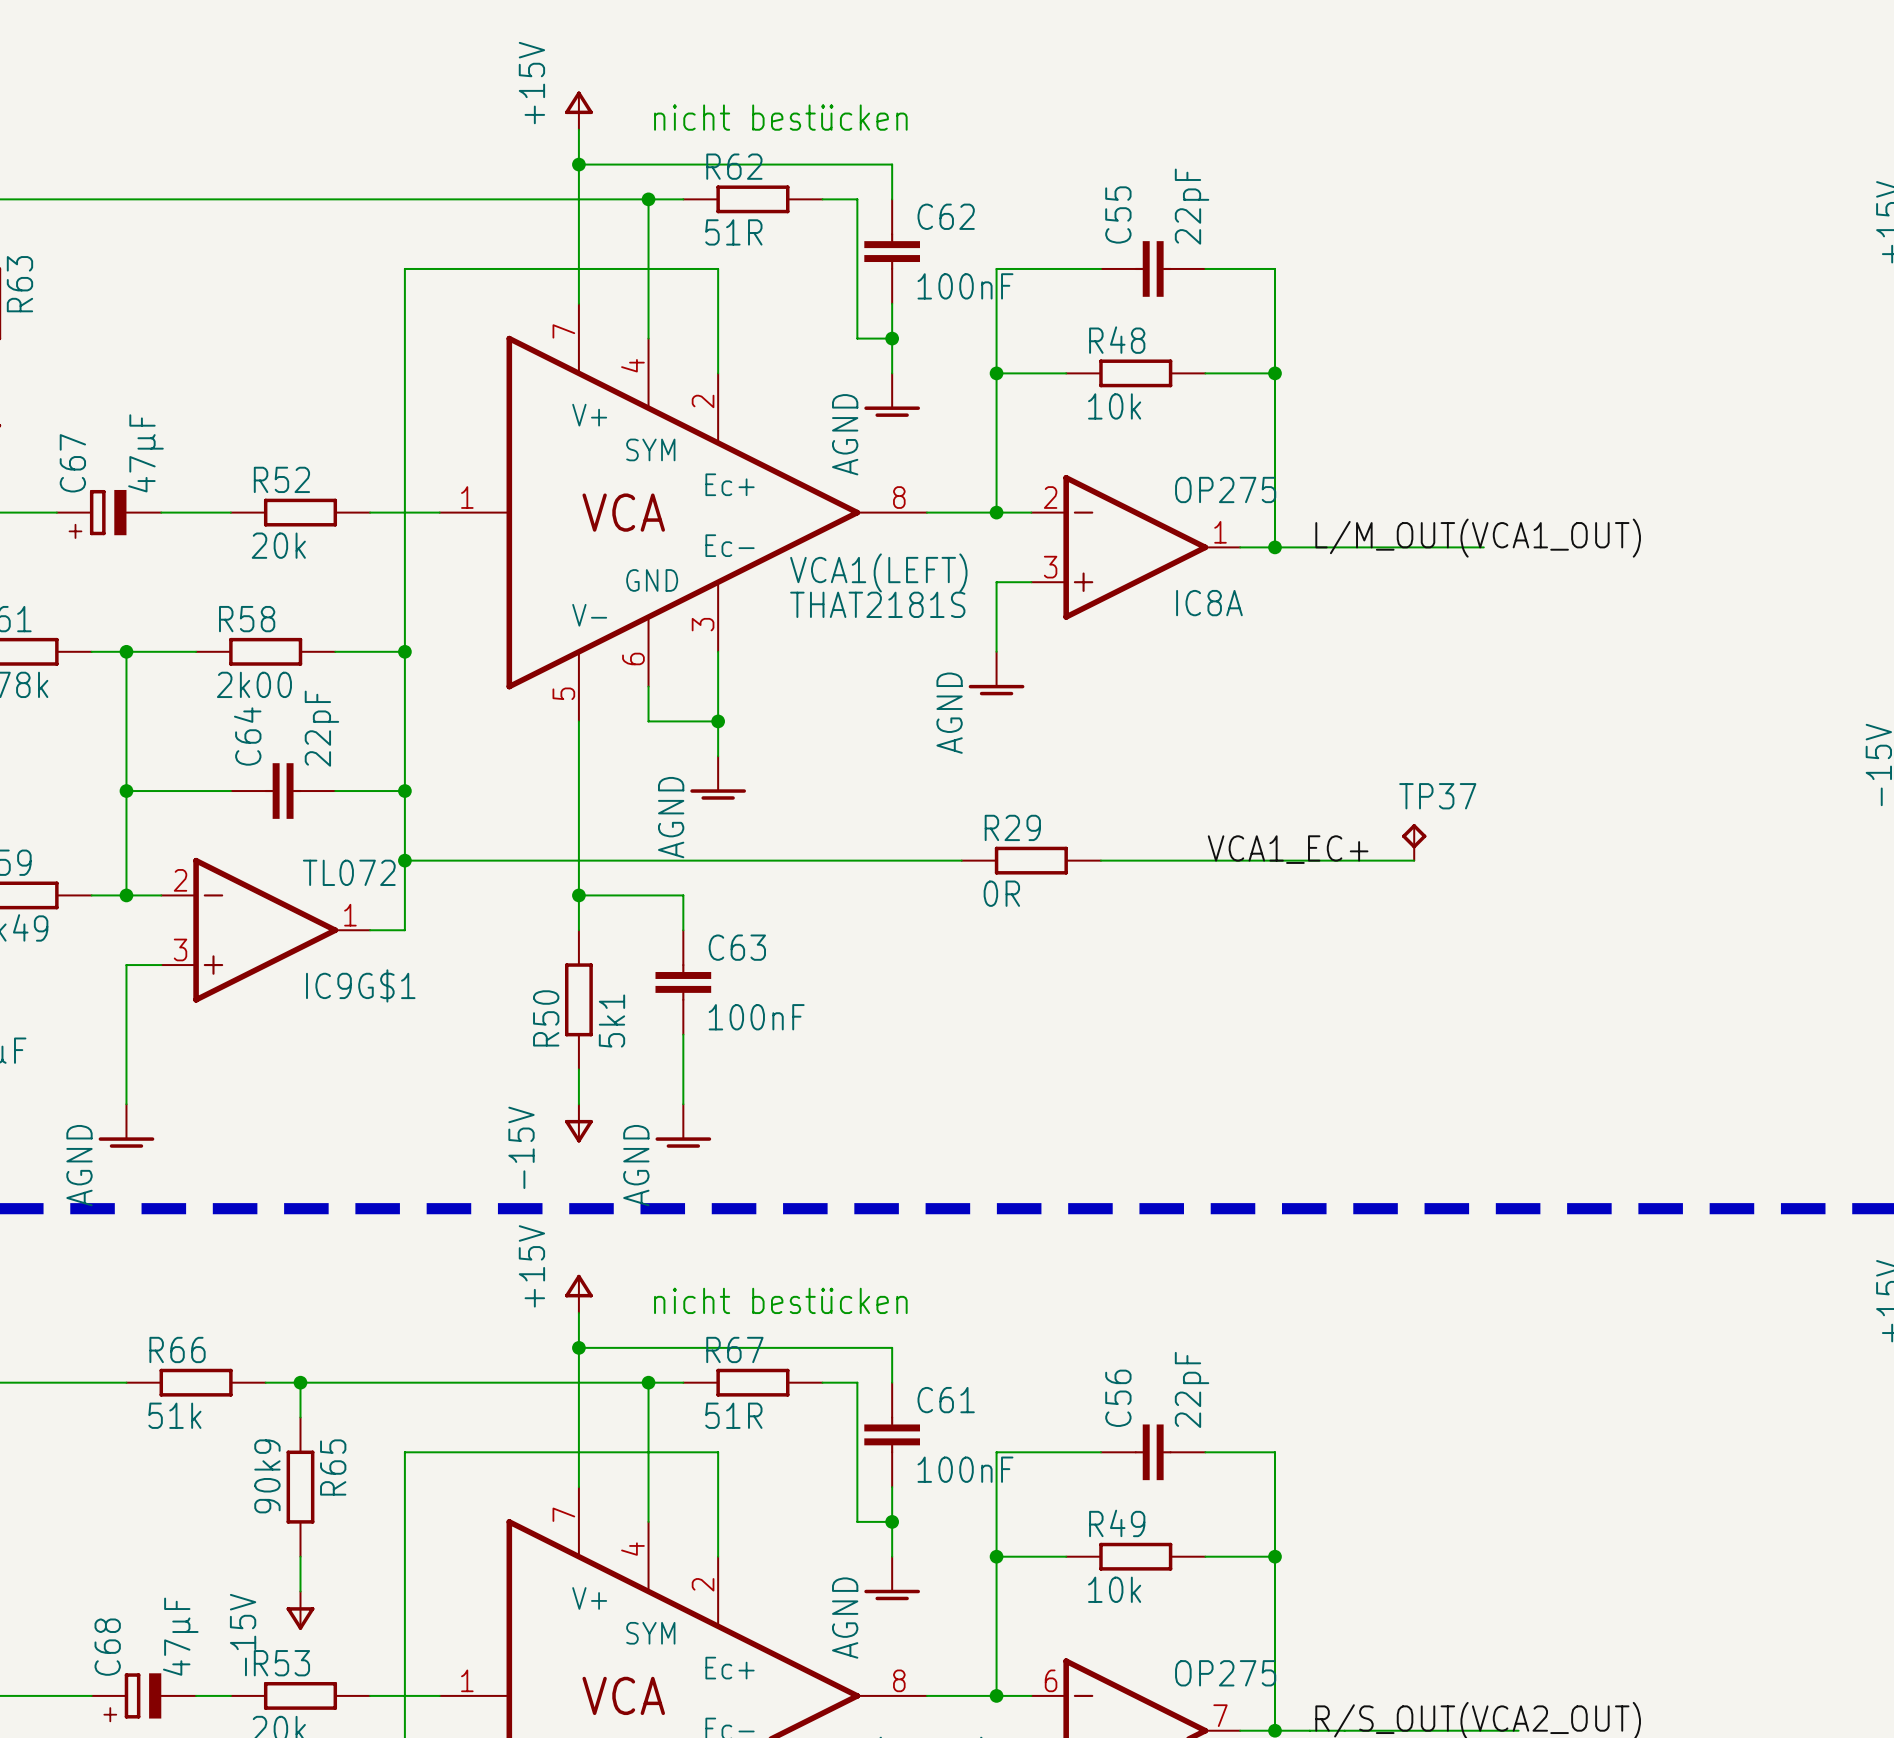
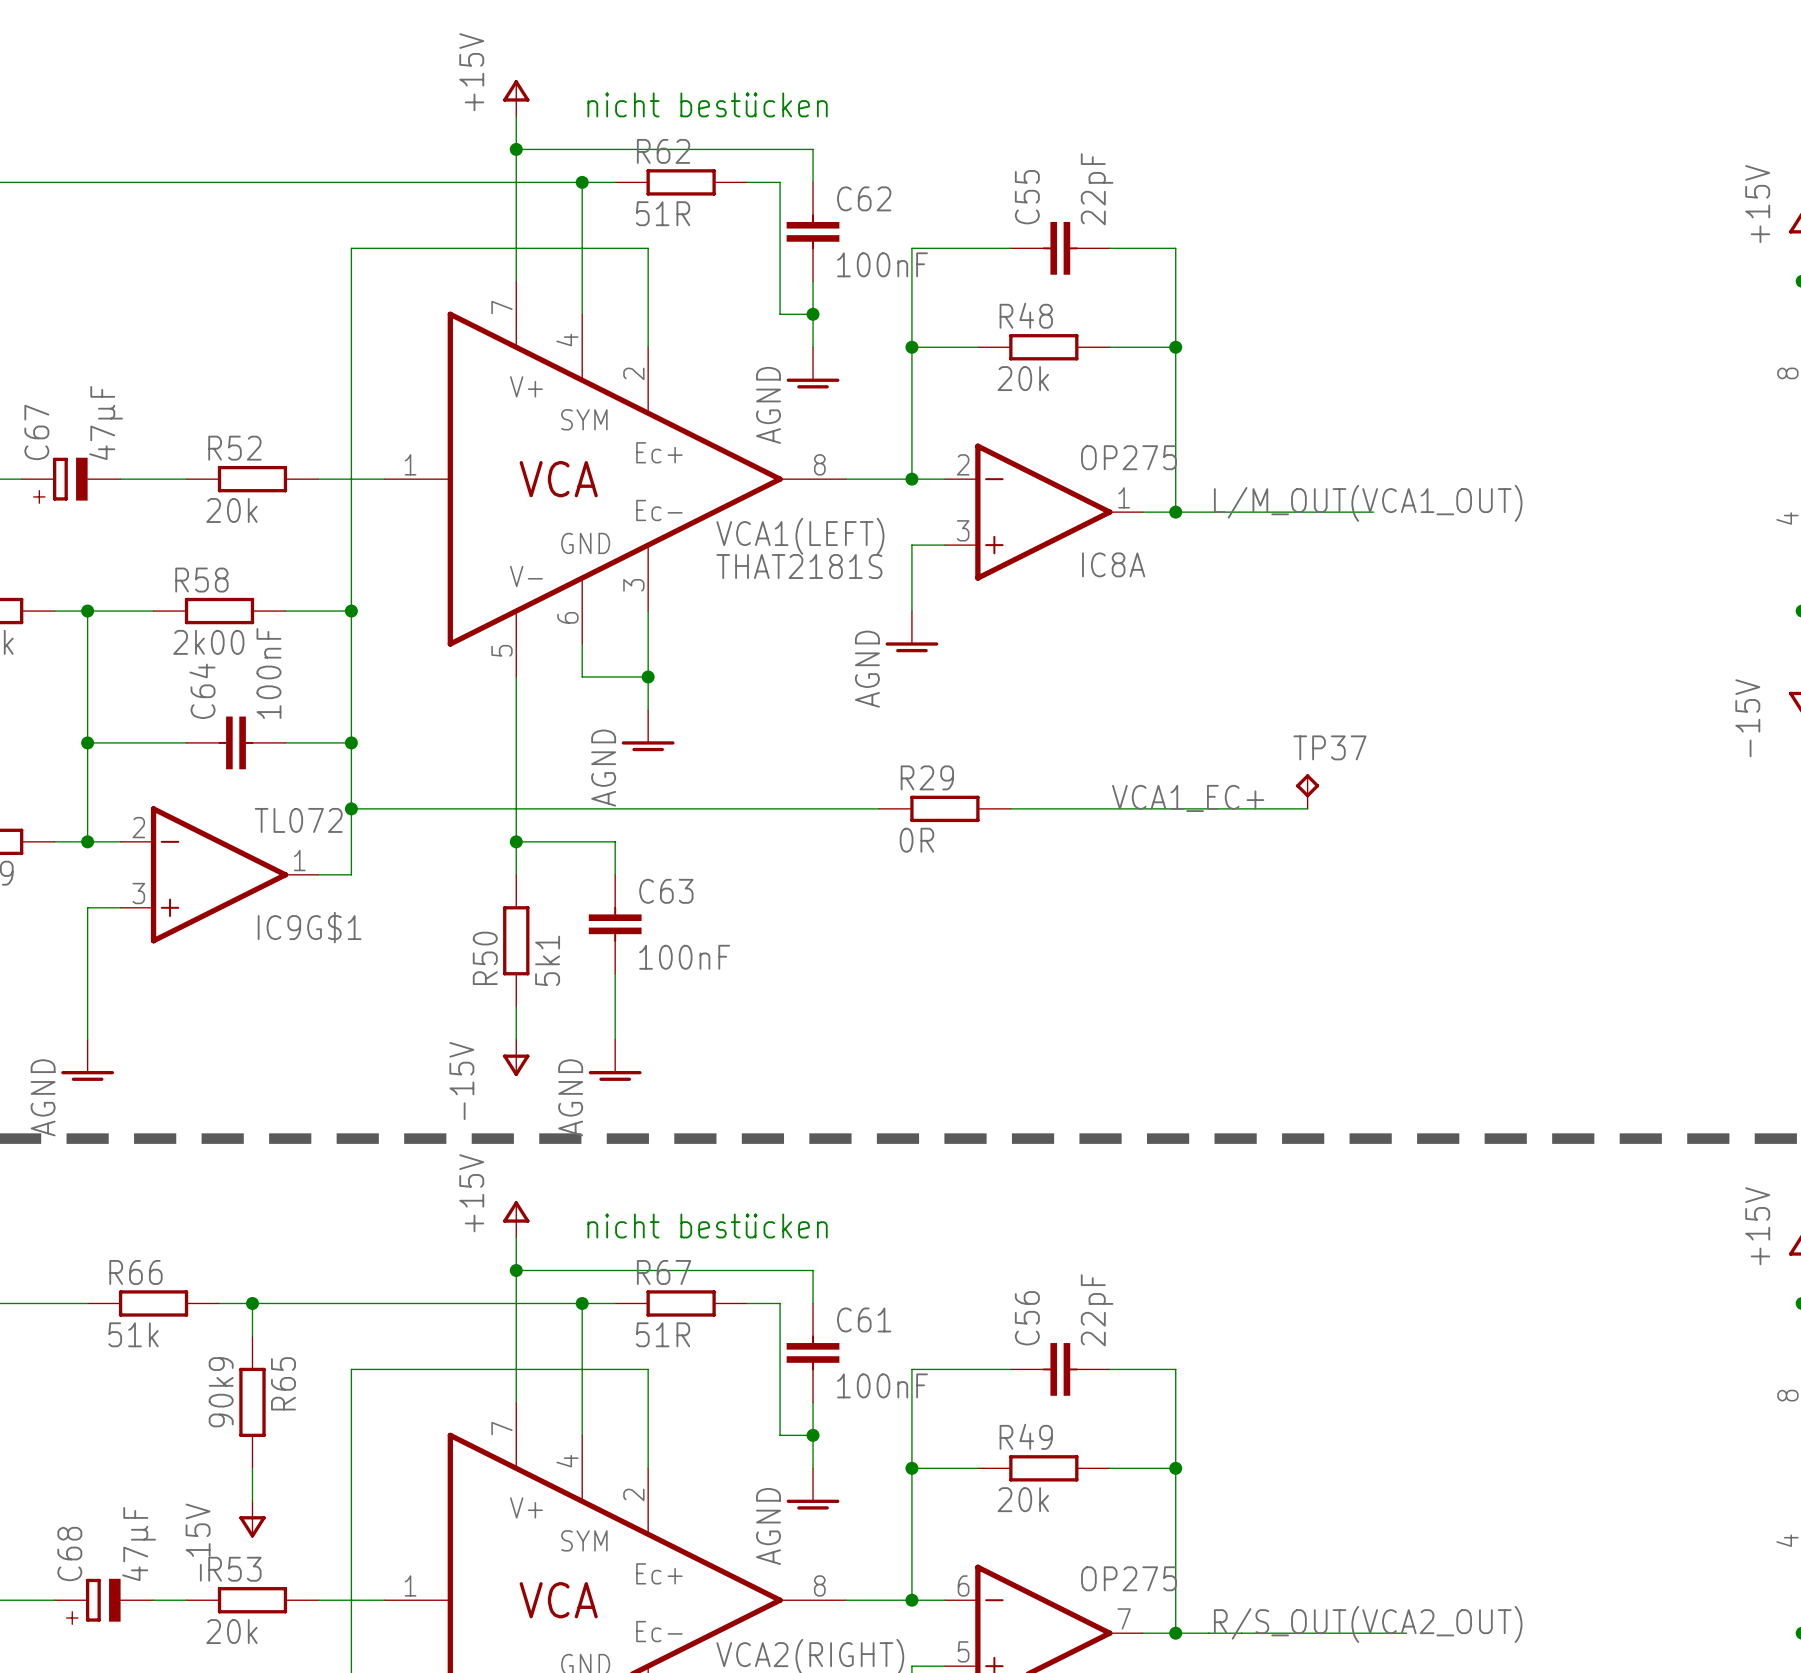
R48 value: 10k (1114, 406) -> 20k (1023, 378)
C64 value: 22pF (321, 728) -> 100nF (268, 673)
R49 value: 10k (1114, 1589) -> 20k (1023, 1499)

